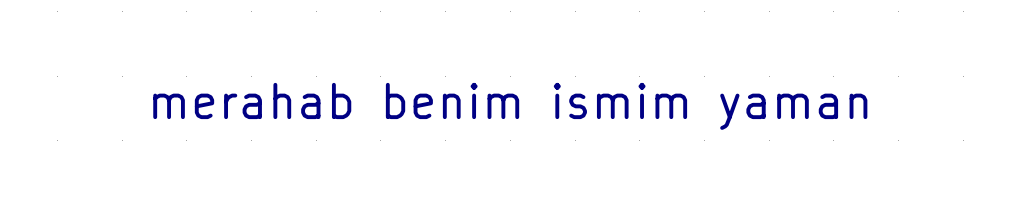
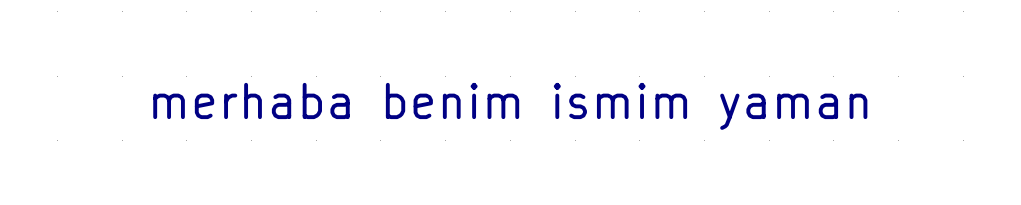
text: merahab benim ismim yaman (510, 106) -> merhaba benim ismim yaman (510, 106)

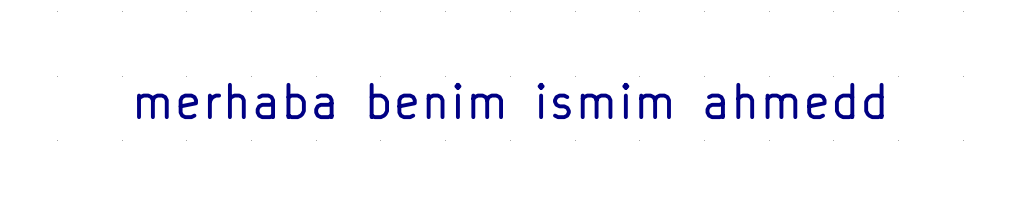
text: merhaba benim ismim yaman (510, 106) -> merhaba benim ismim ahmedd (510, 100)

